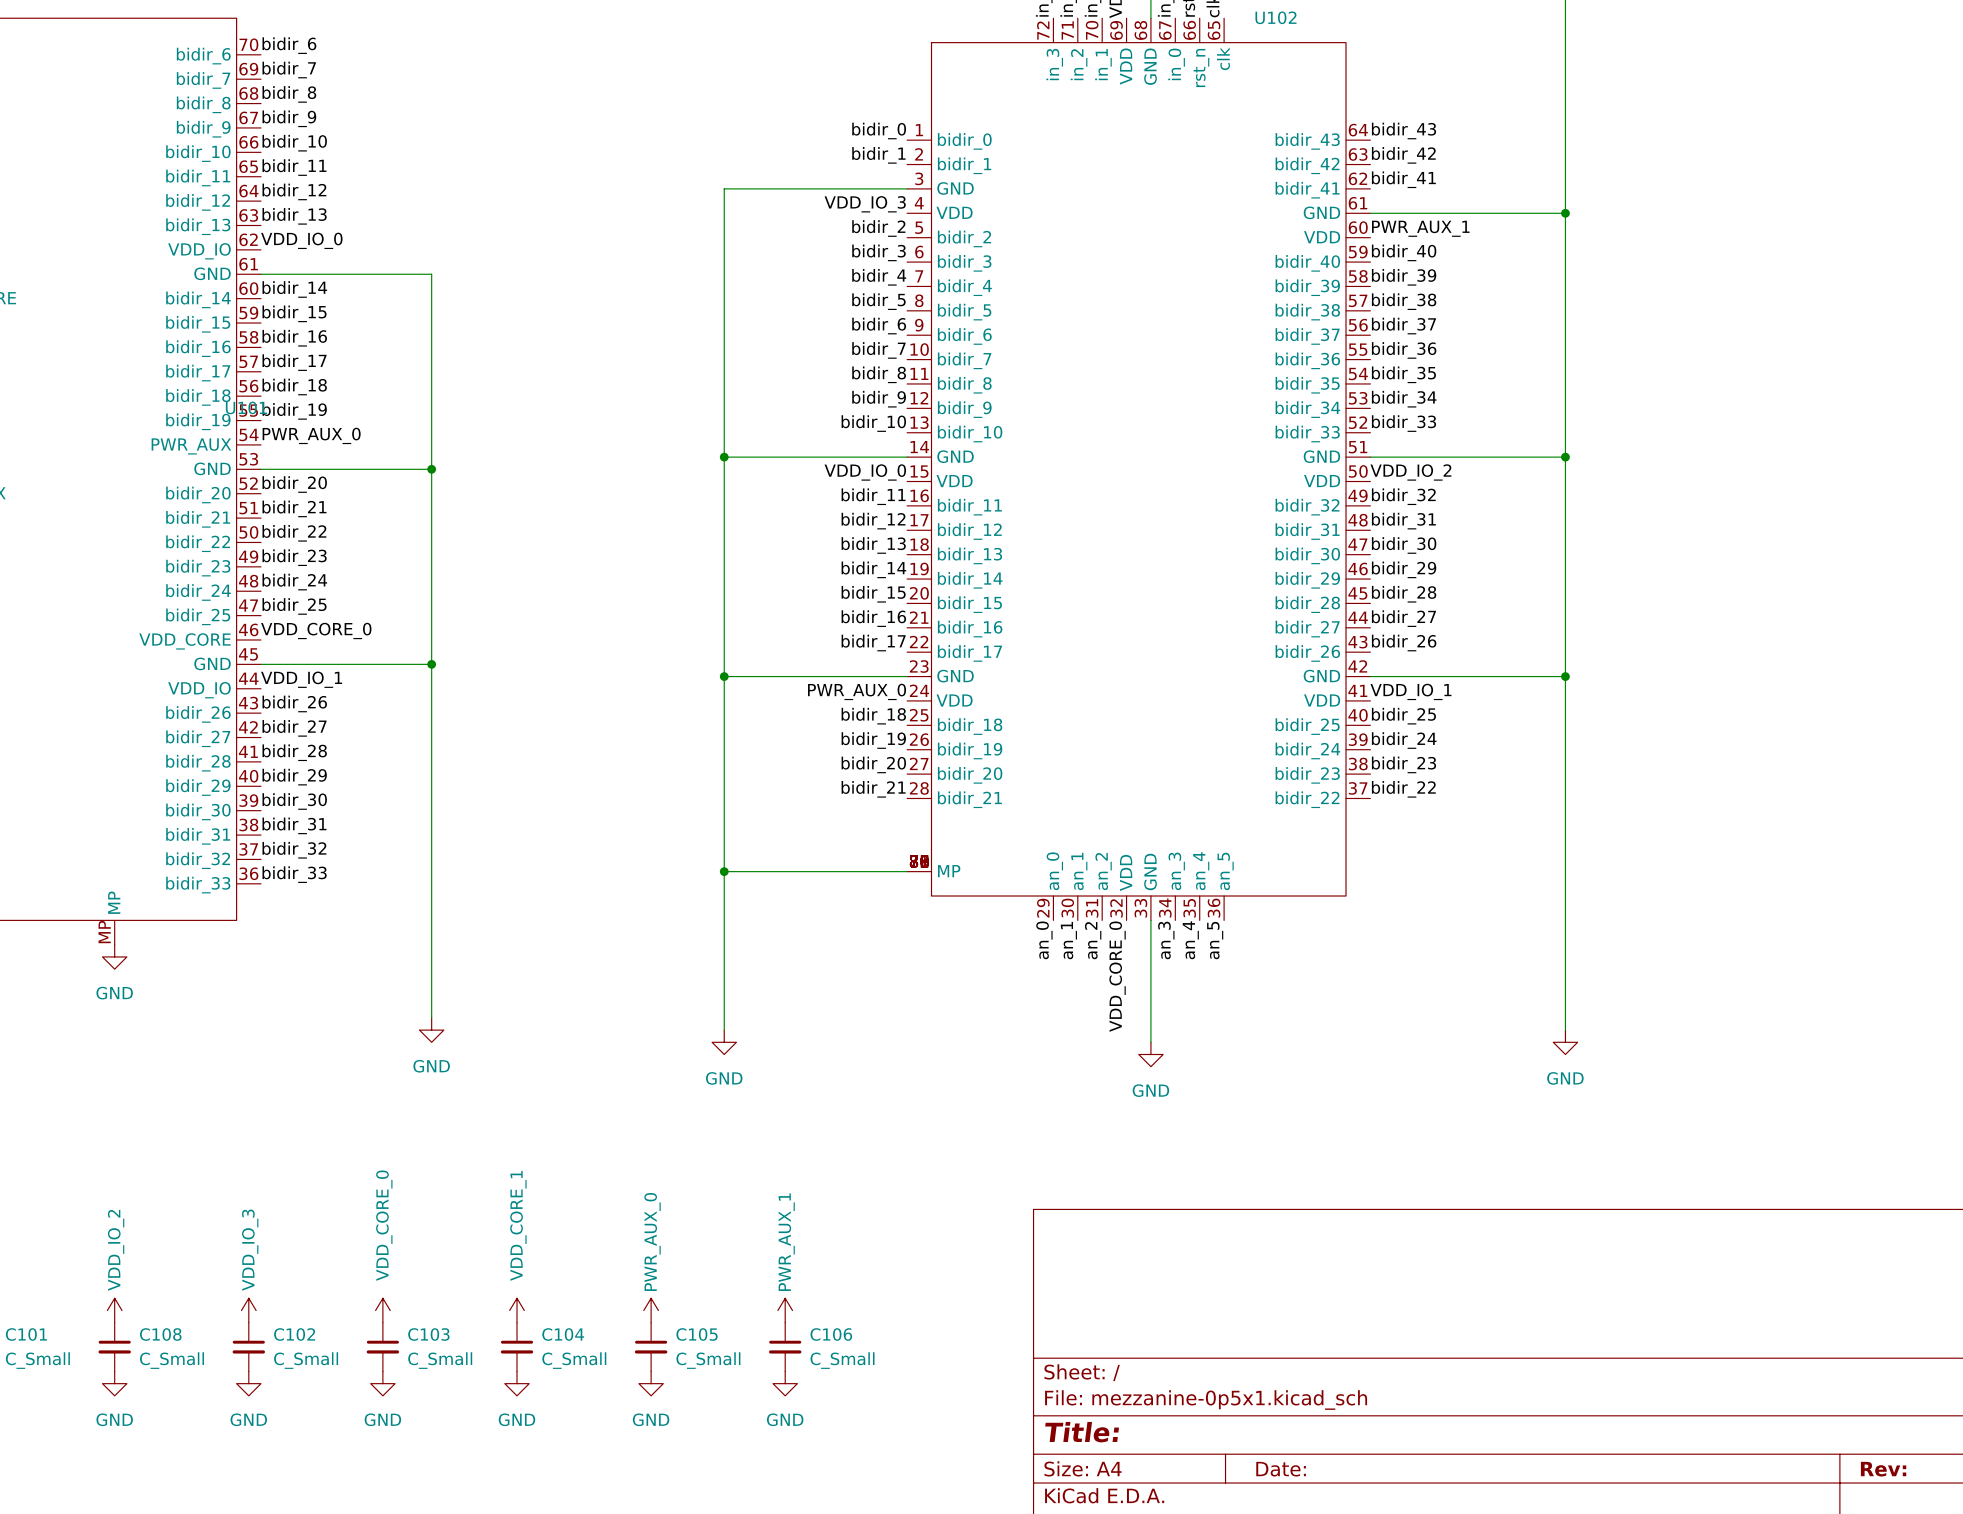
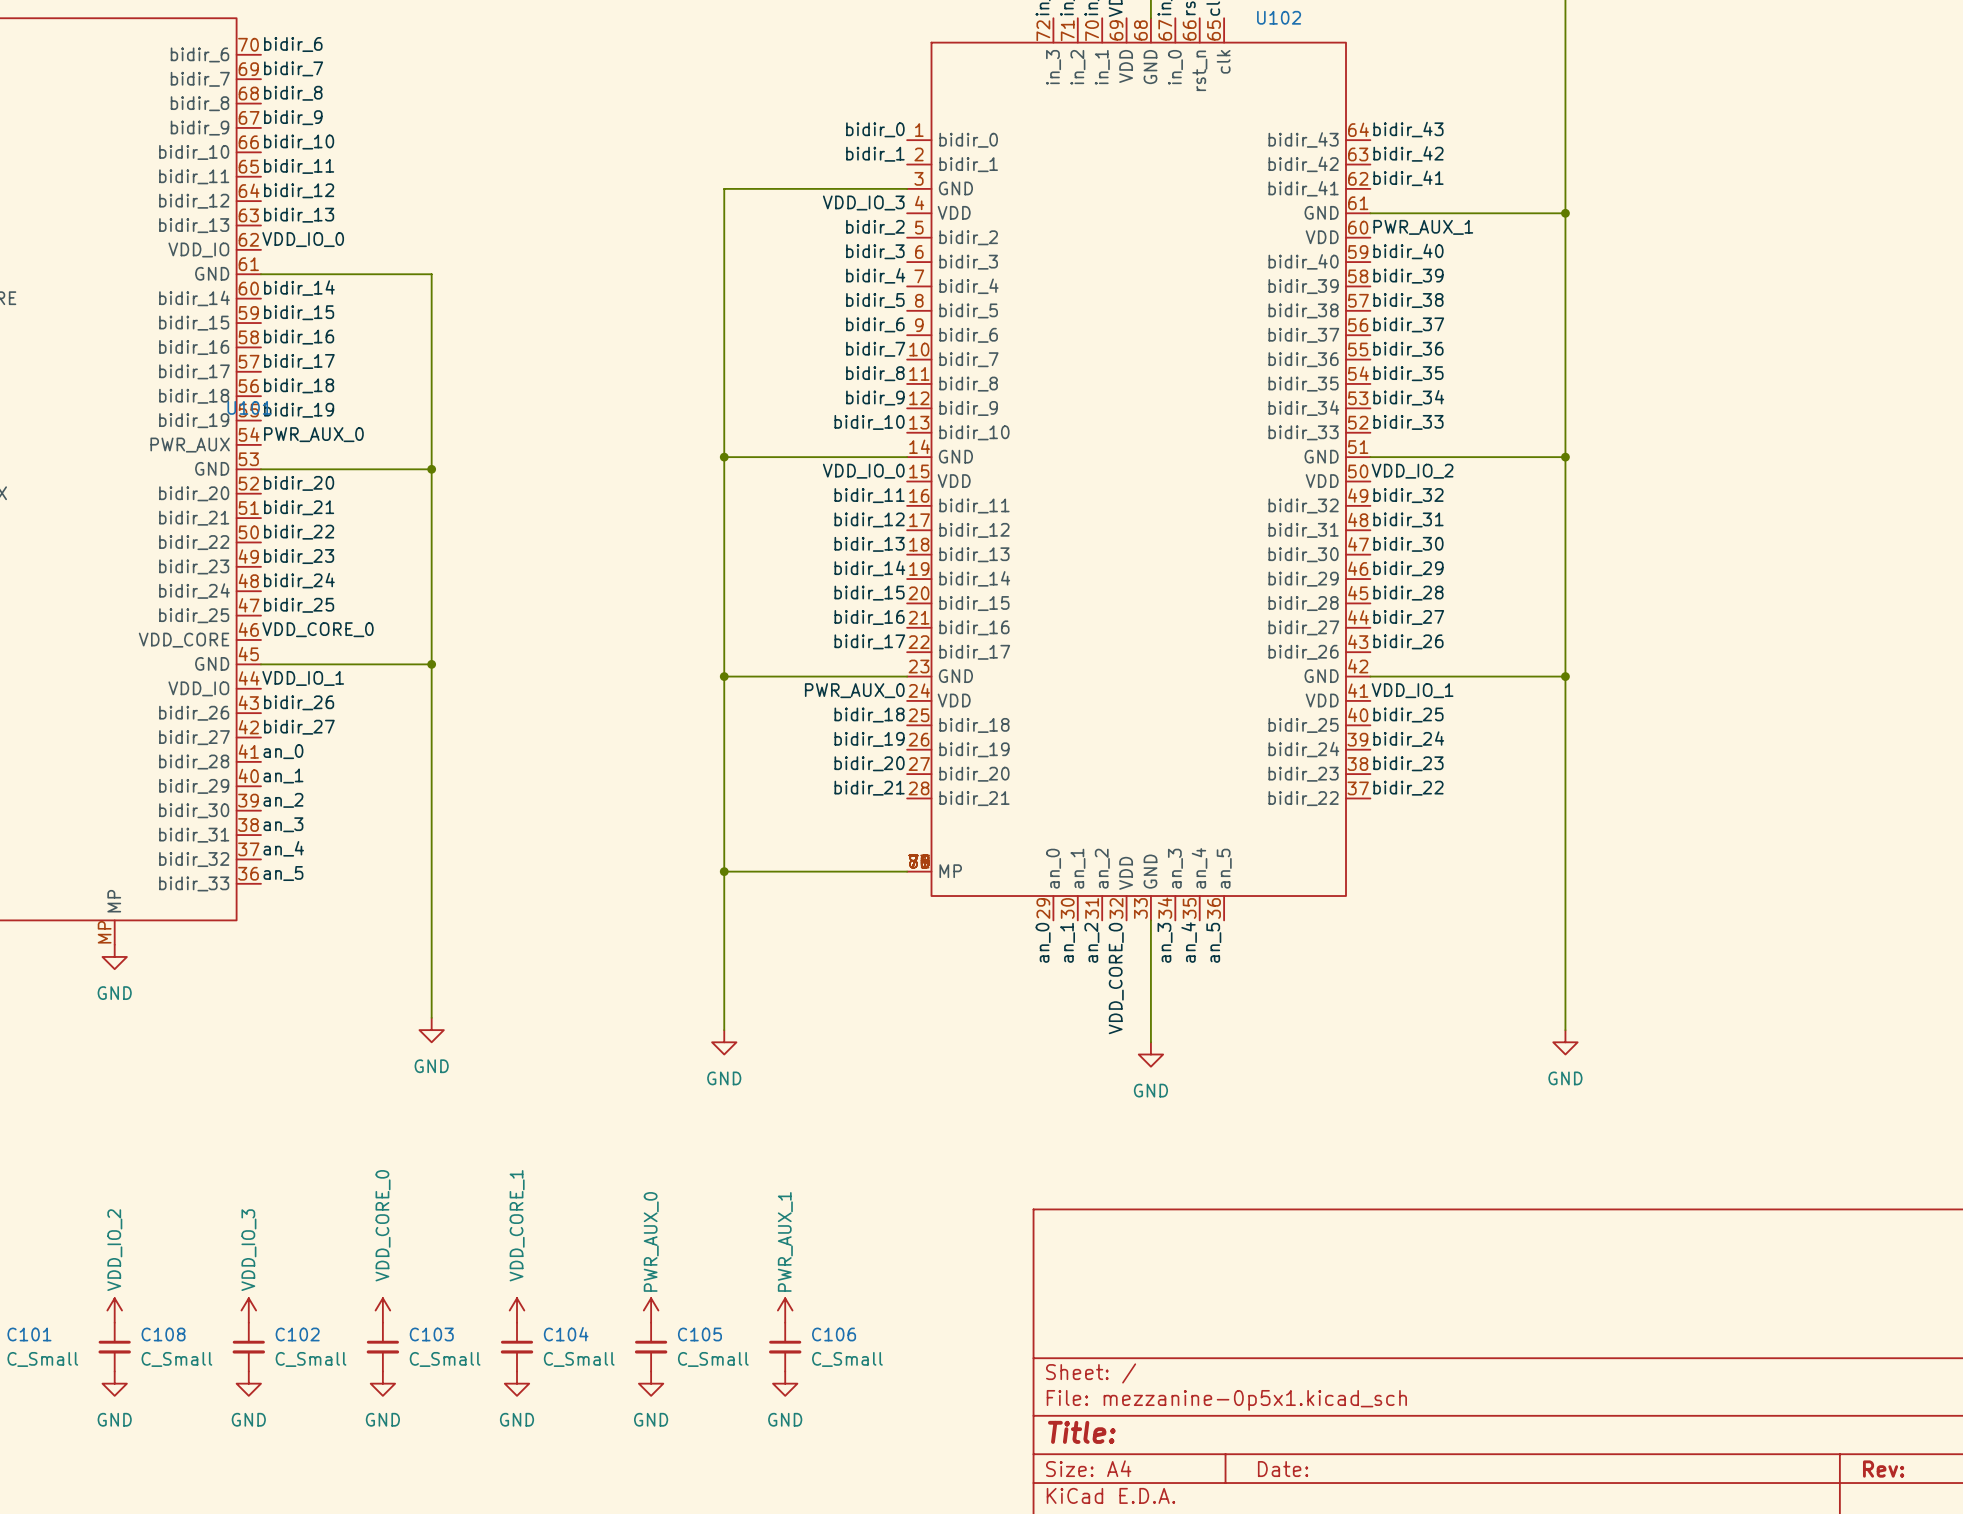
label: bidir_28 (294, 752) -> an_0 (283, 751)
label: bidir_29 (294, 777) -> an_1 (283, 775)
label: bidir_30 (294, 801) -> an_2 (283, 800)
label: bidir_31 (294, 825) -> an_3 (283, 824)
label: bidir_32 (294, 850) -> an_4 (283, 848)
label: bidir_33 (294, 874) -> an_5 (283, 873)

